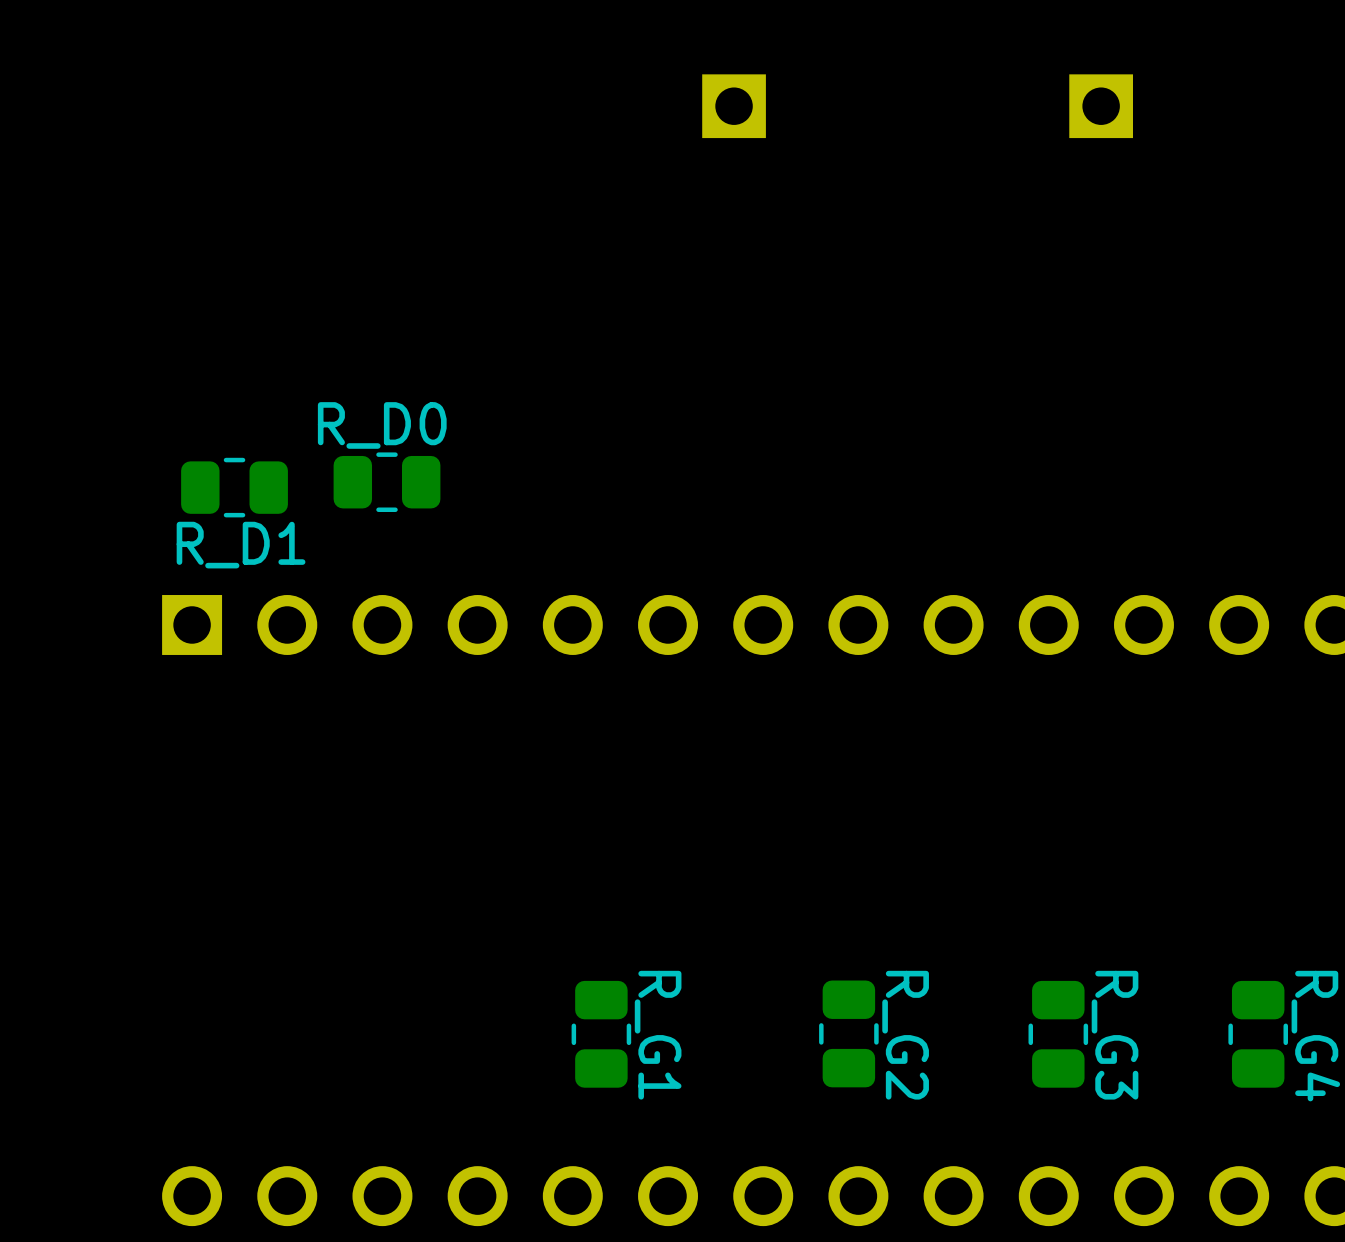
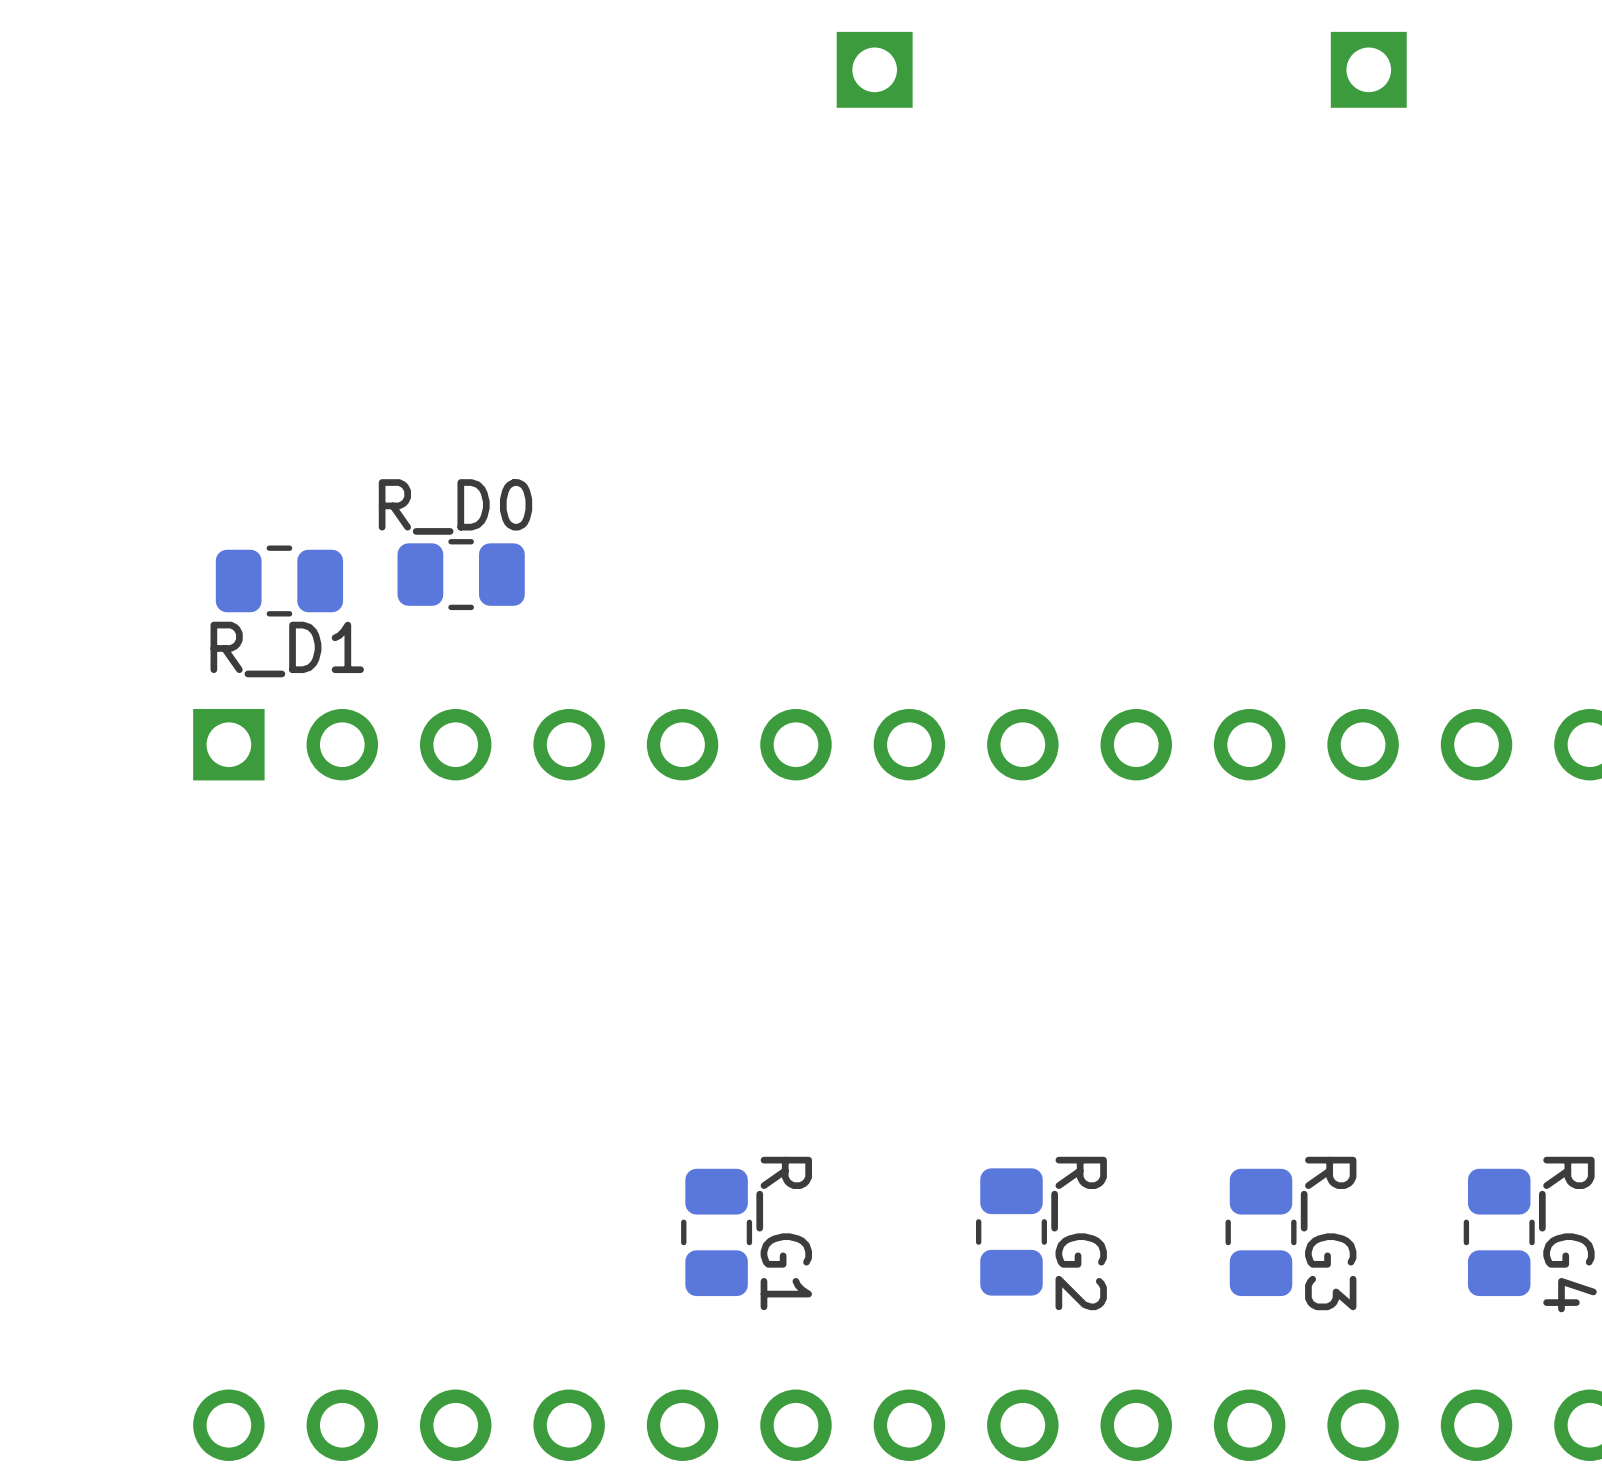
part position: (734, 106) -> (874, 69)
part position: (1101, 106) -> (1368, 69)

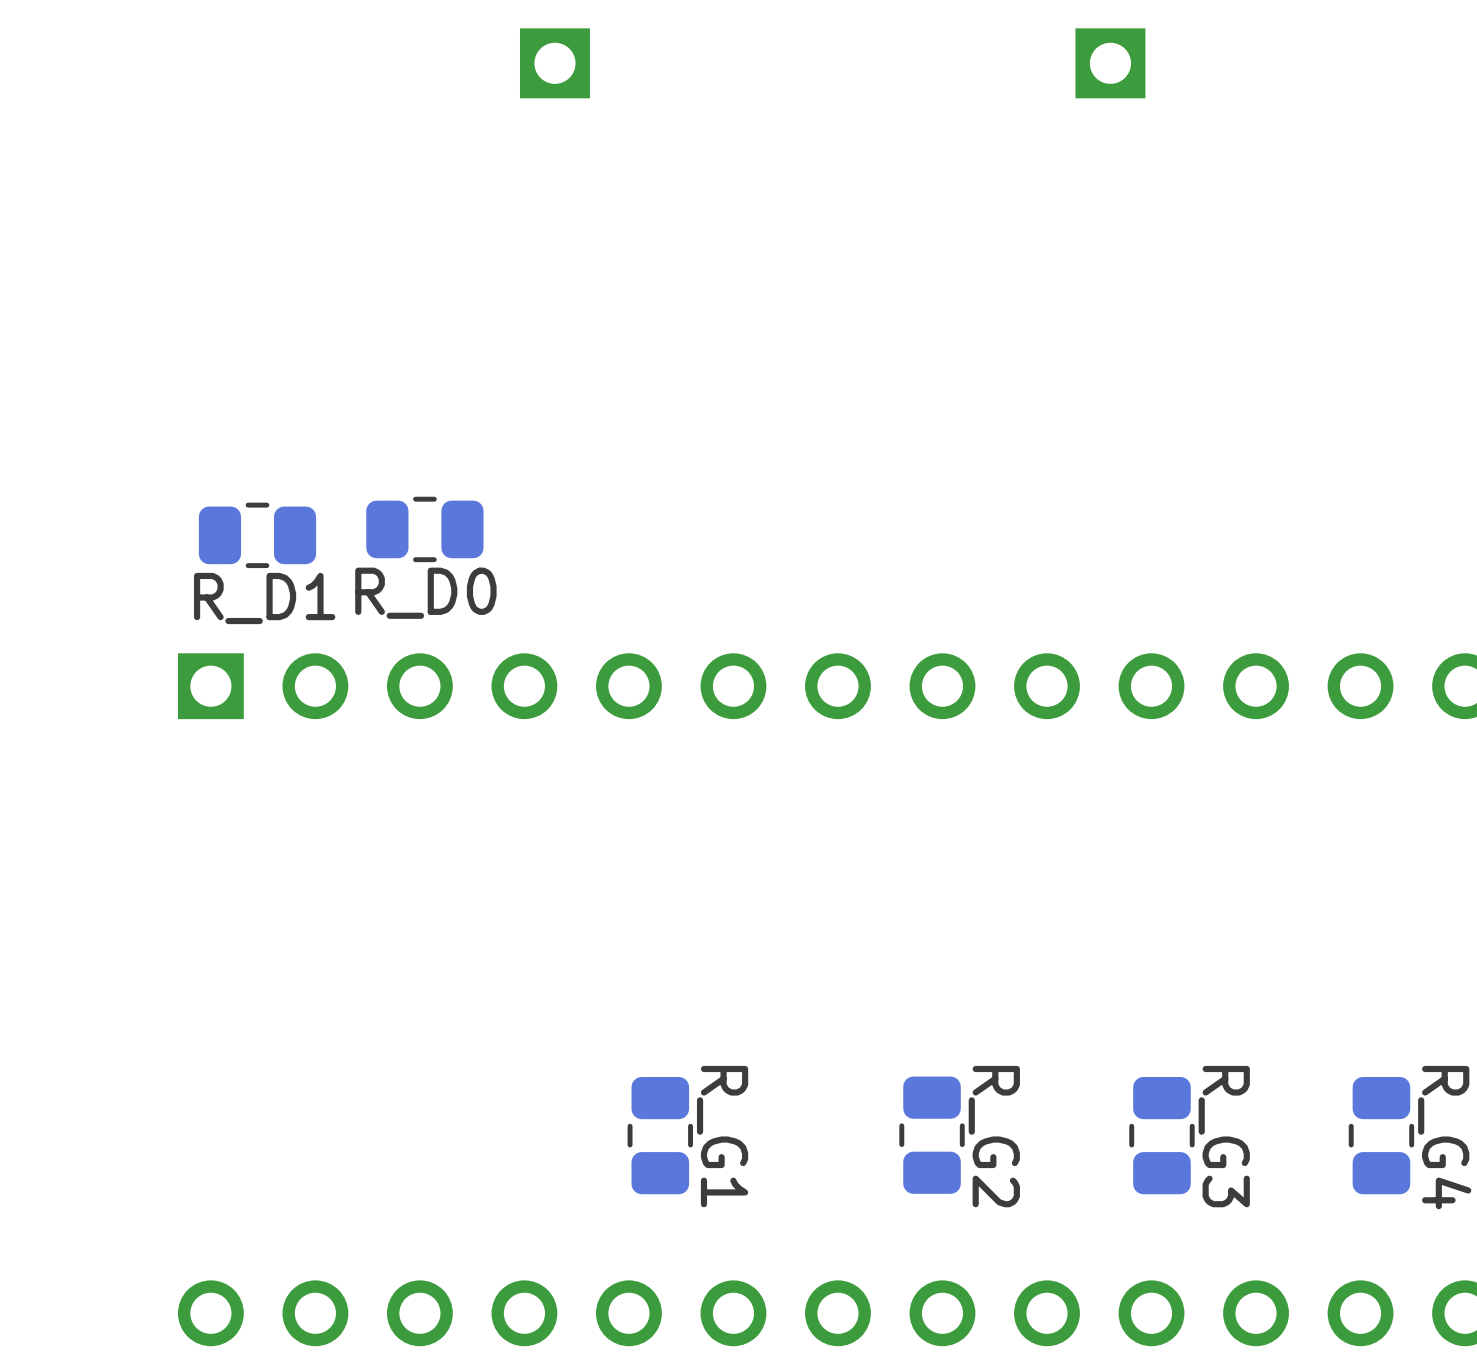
part: none -> (554, 63)
part: (874, 69) -> none
part position: (1368, 69) -> (1110, 63)
R_D0 name position: R_D0 (455, 506) -> R_D0 (425, 593)

